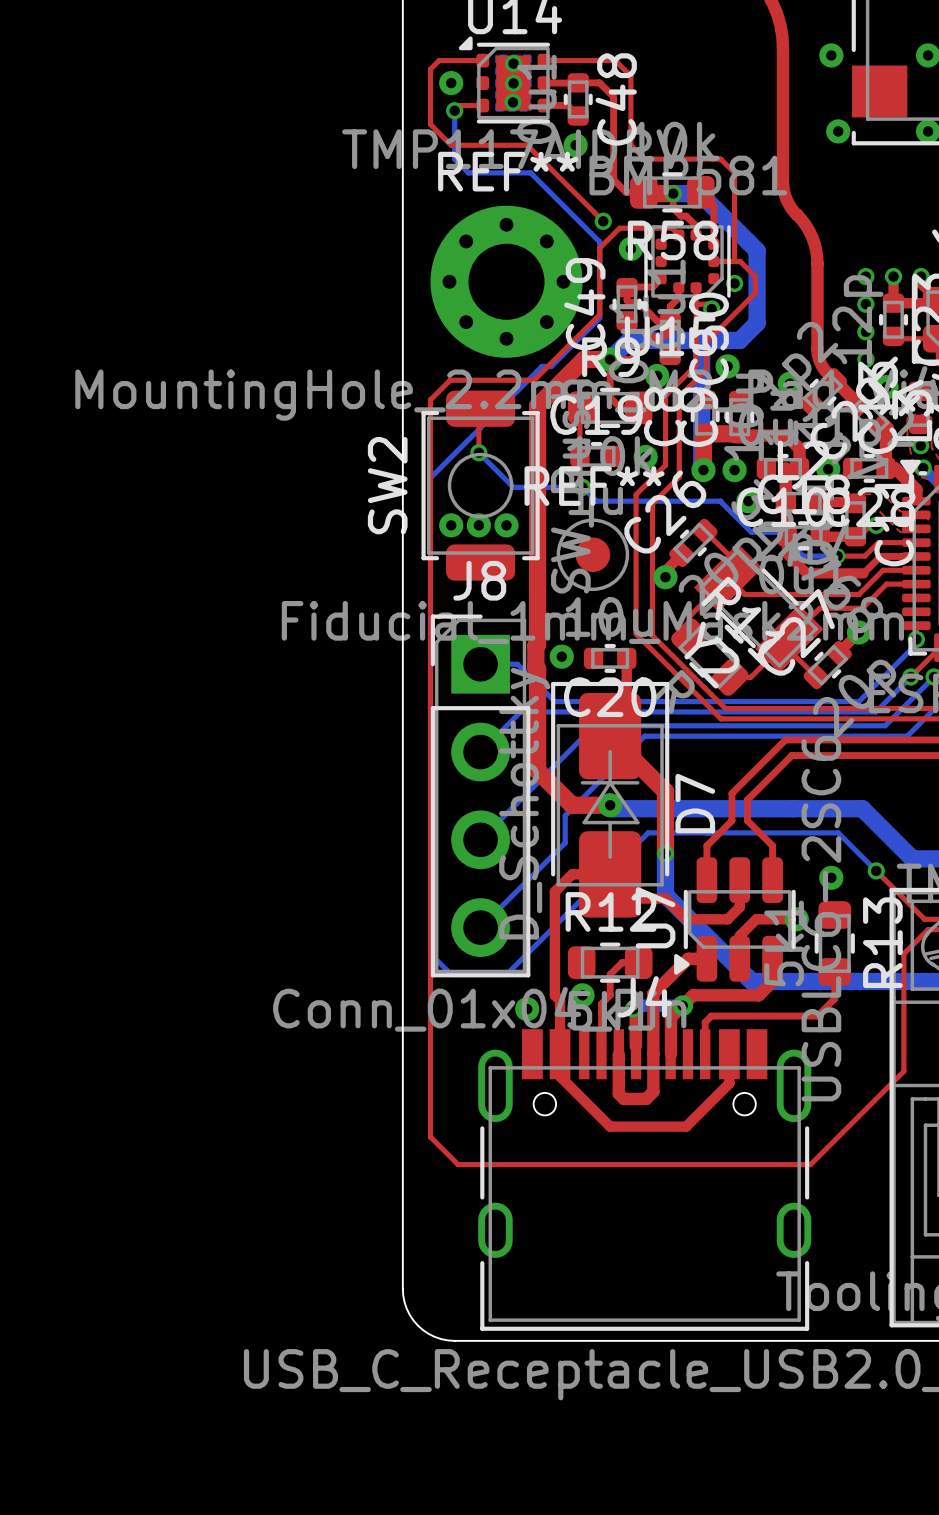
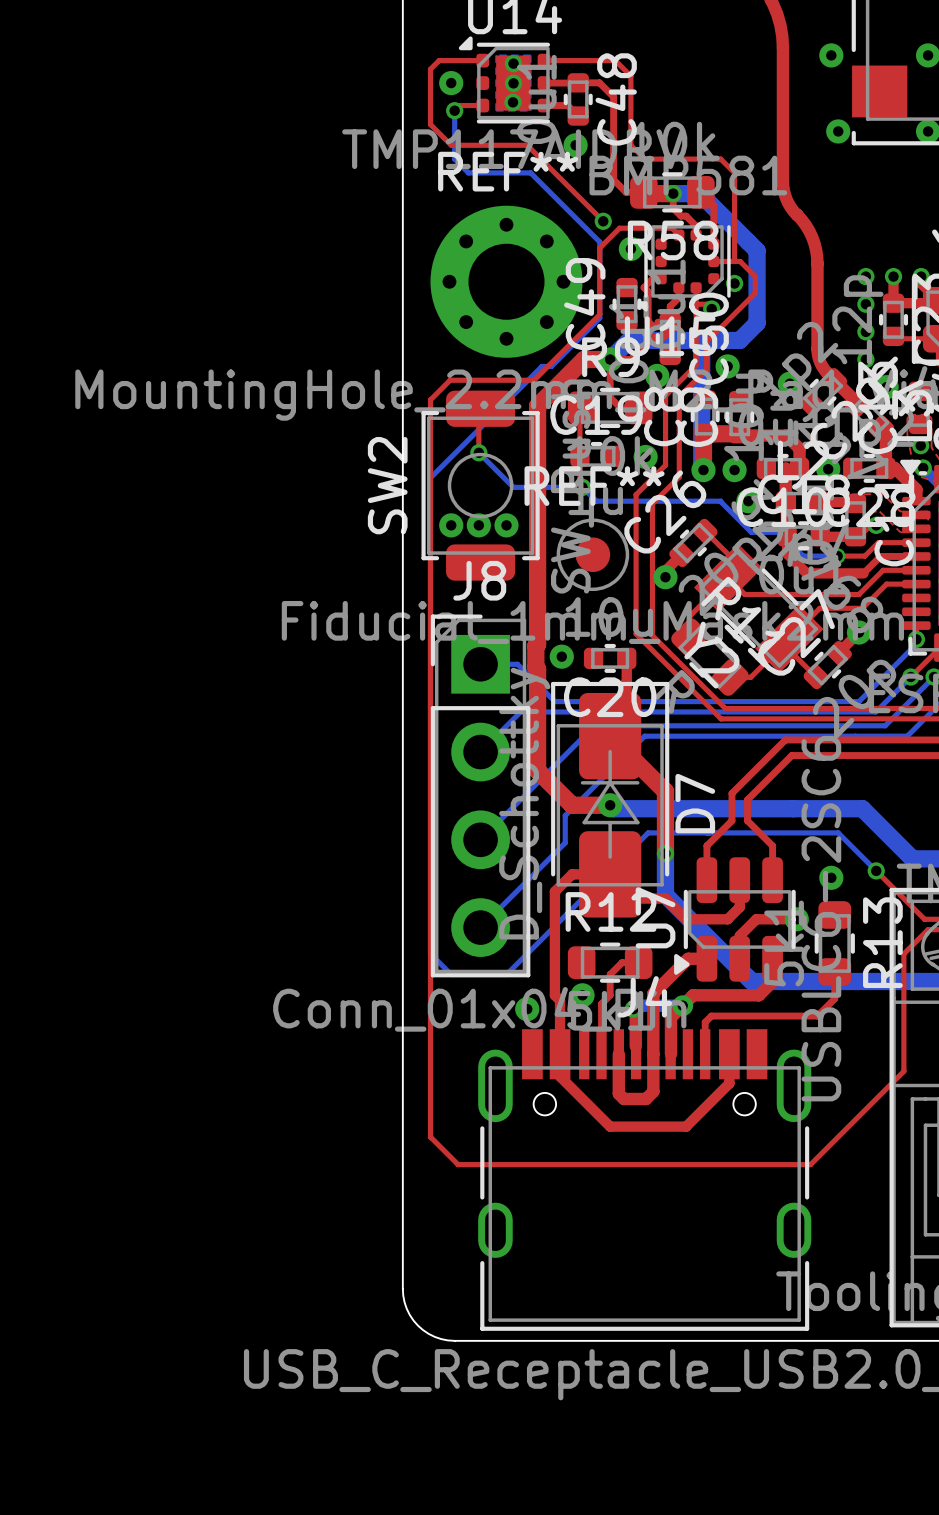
top track: (661, 278) (652, 286) (627, 287) (627, 300) (629, 302) (638, 302) (658, 322) -> (661, 278) (652, 278) (644, 287) (648, 291) (648, 321) (653, 326)

